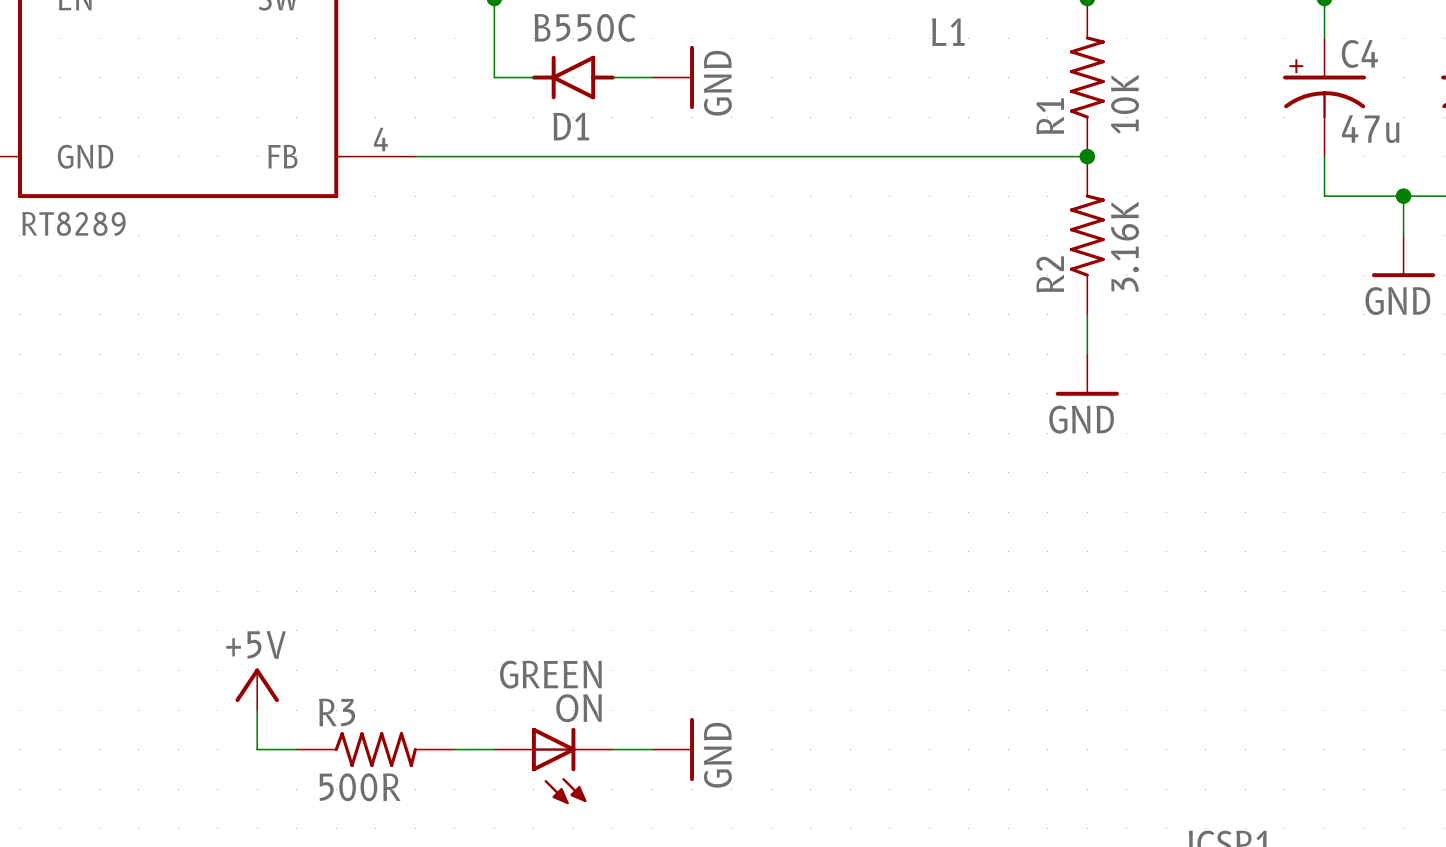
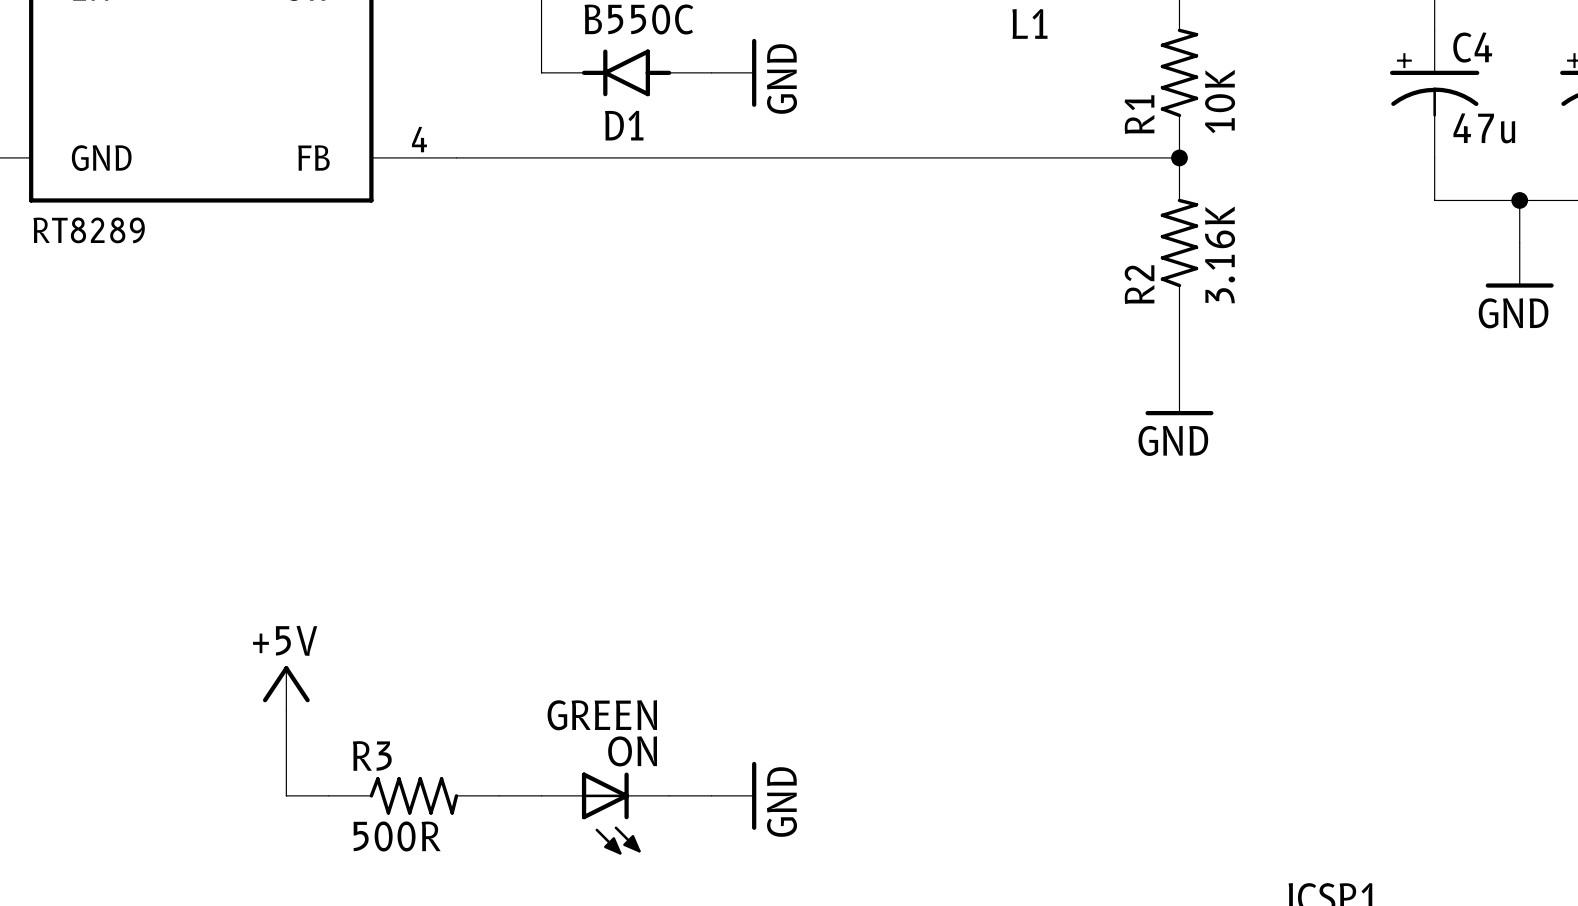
power symbol position: +5V (257, 689) -> +5V (286, 688)

